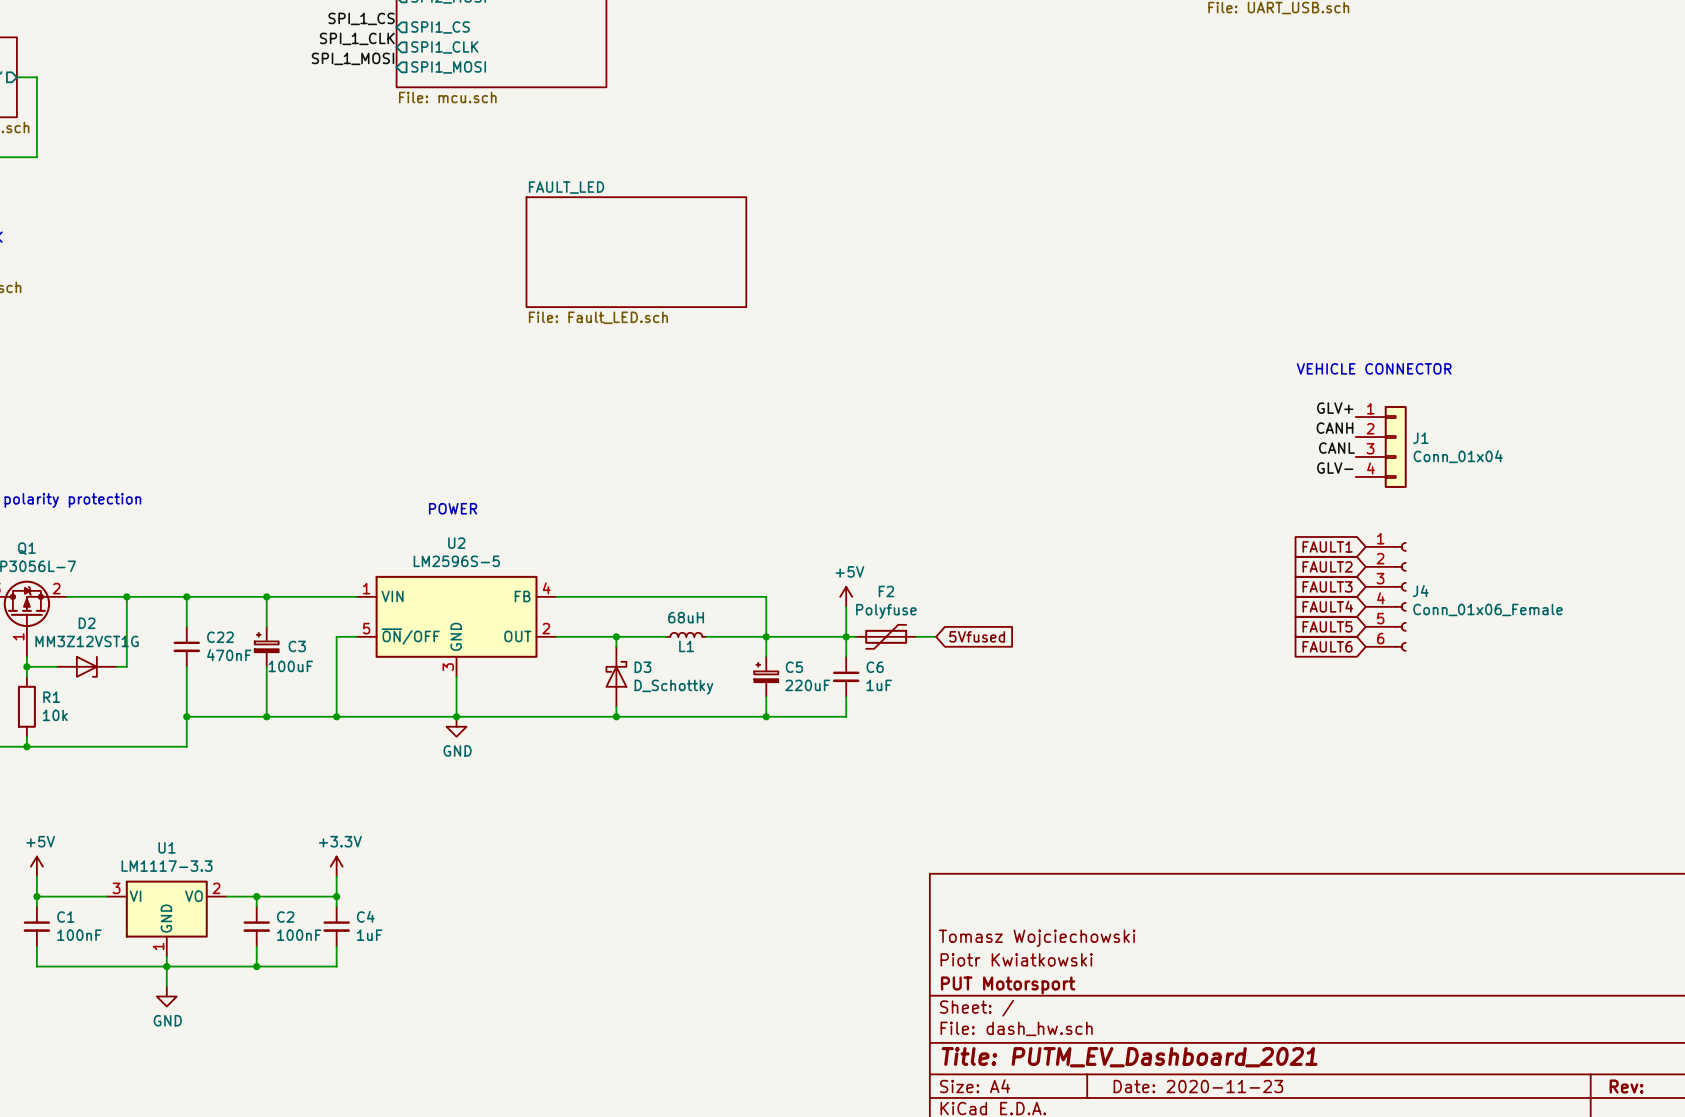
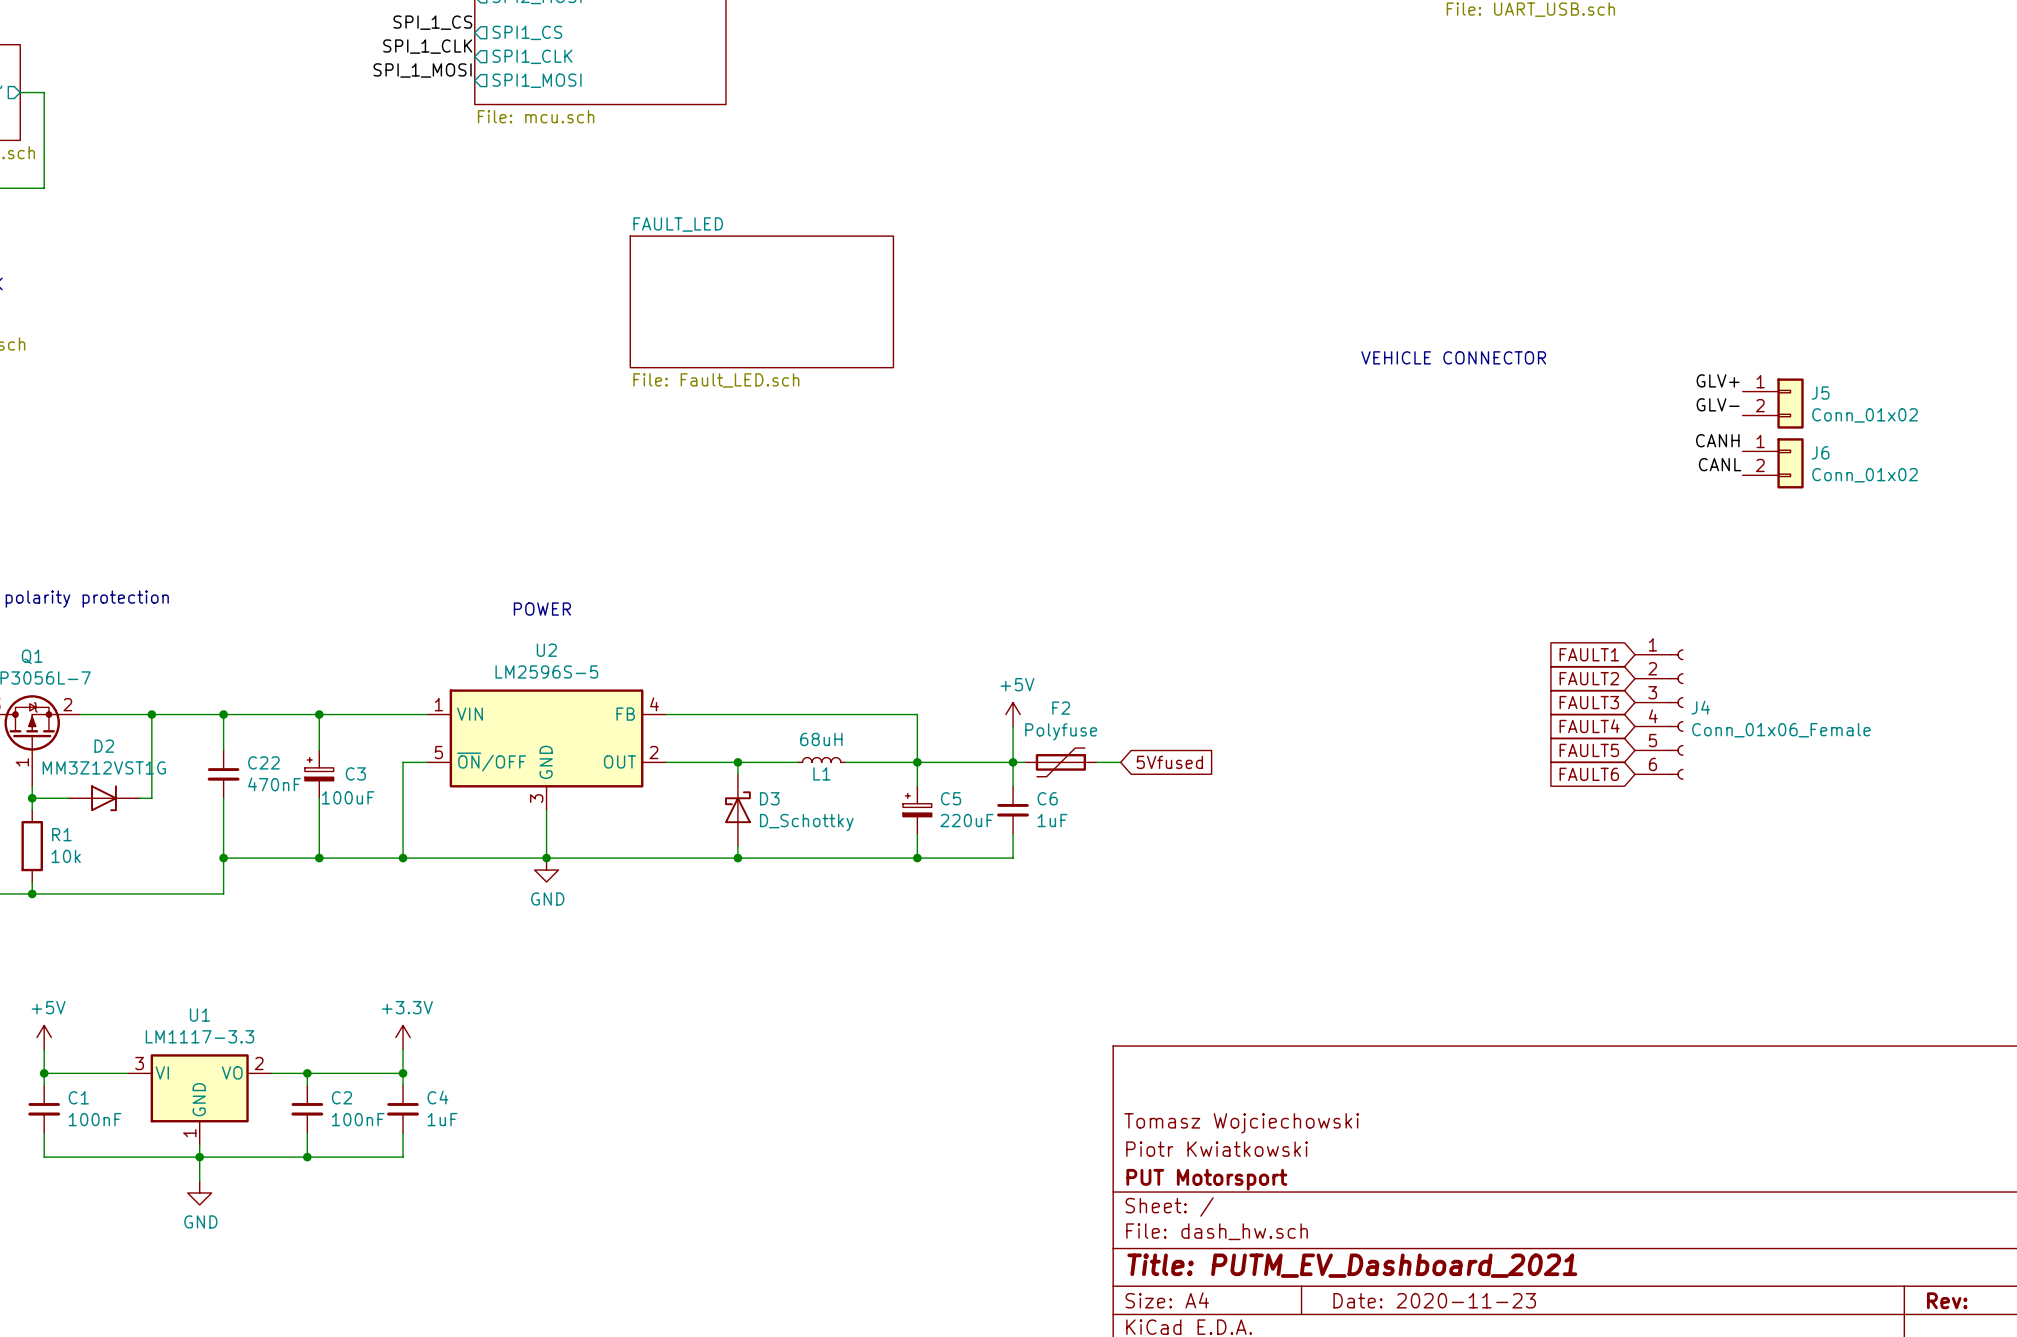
J5: none -> Conn_01x02 (1773, 403)
text position: VEHICLE CONNECTOR (1374, 368) -> VEHICLE CONNECTOR (1453, 357)
J6: none -> Conn_01x02 (1773, 463)
label position: GLV+ (1335, 408) -> GLV+ (1718, 380)
label position: CANH (1334, 428) -> CANH (1717, 440)
J1: Conn_01x04 (1381, 446) -> none
label position: CANL (1336, 448) -> CANL (1720, 464)
label position: GLV- (1335, 468) -> GLV- (1718, 404)

